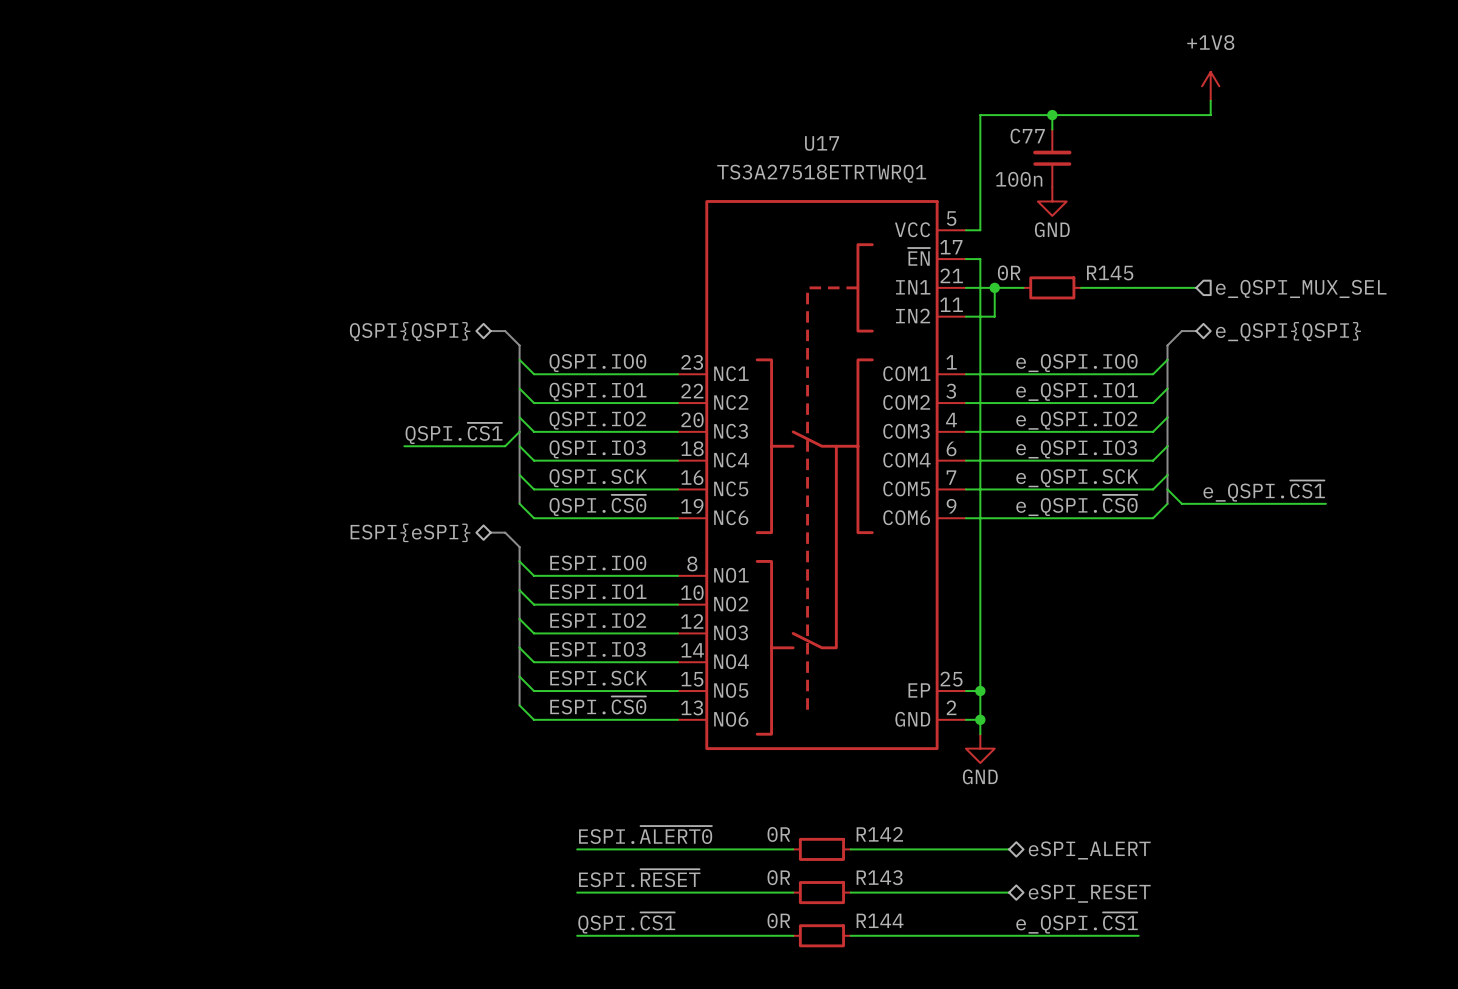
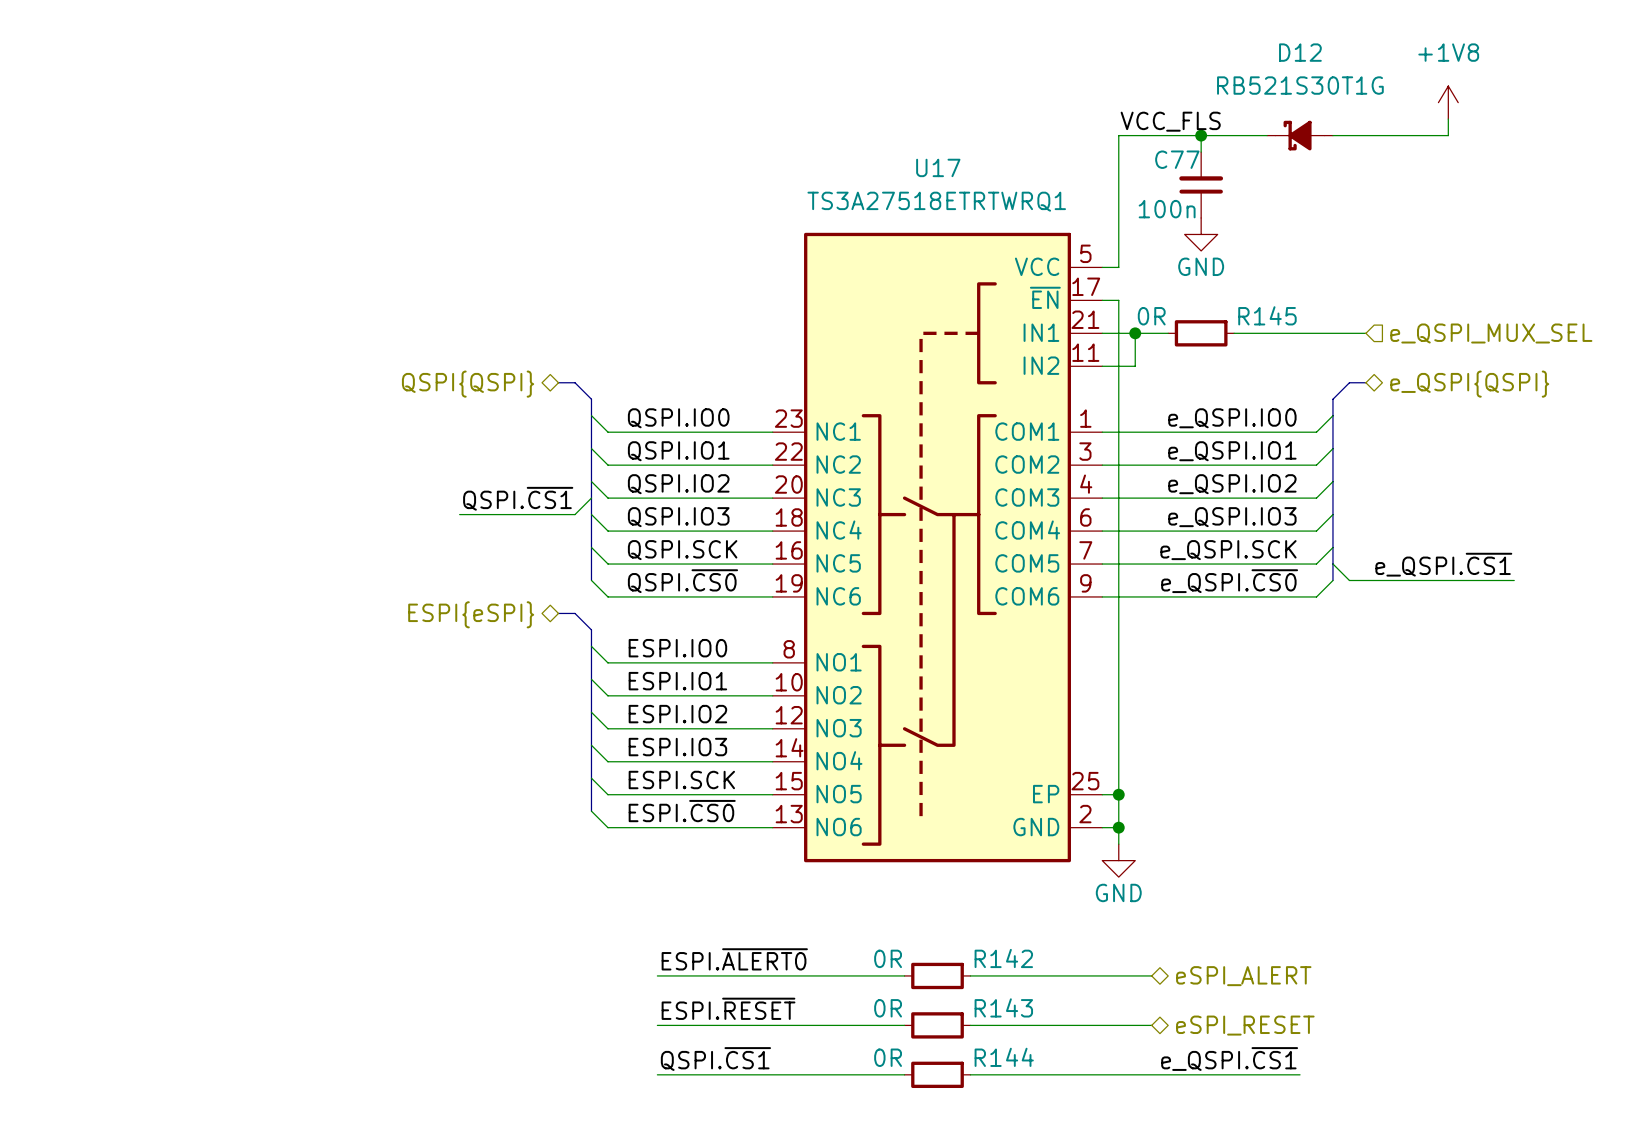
power symbol position: +1V8 (1210, 86) -> +1V8 (1448, 102)
wire: (1210, 100) (1210, 115) -> (1448, 119) (1448, 135) (1382, 135)
label: none -> VCC_FLS (1170, 121)
D12: none -> (1300, 135)

